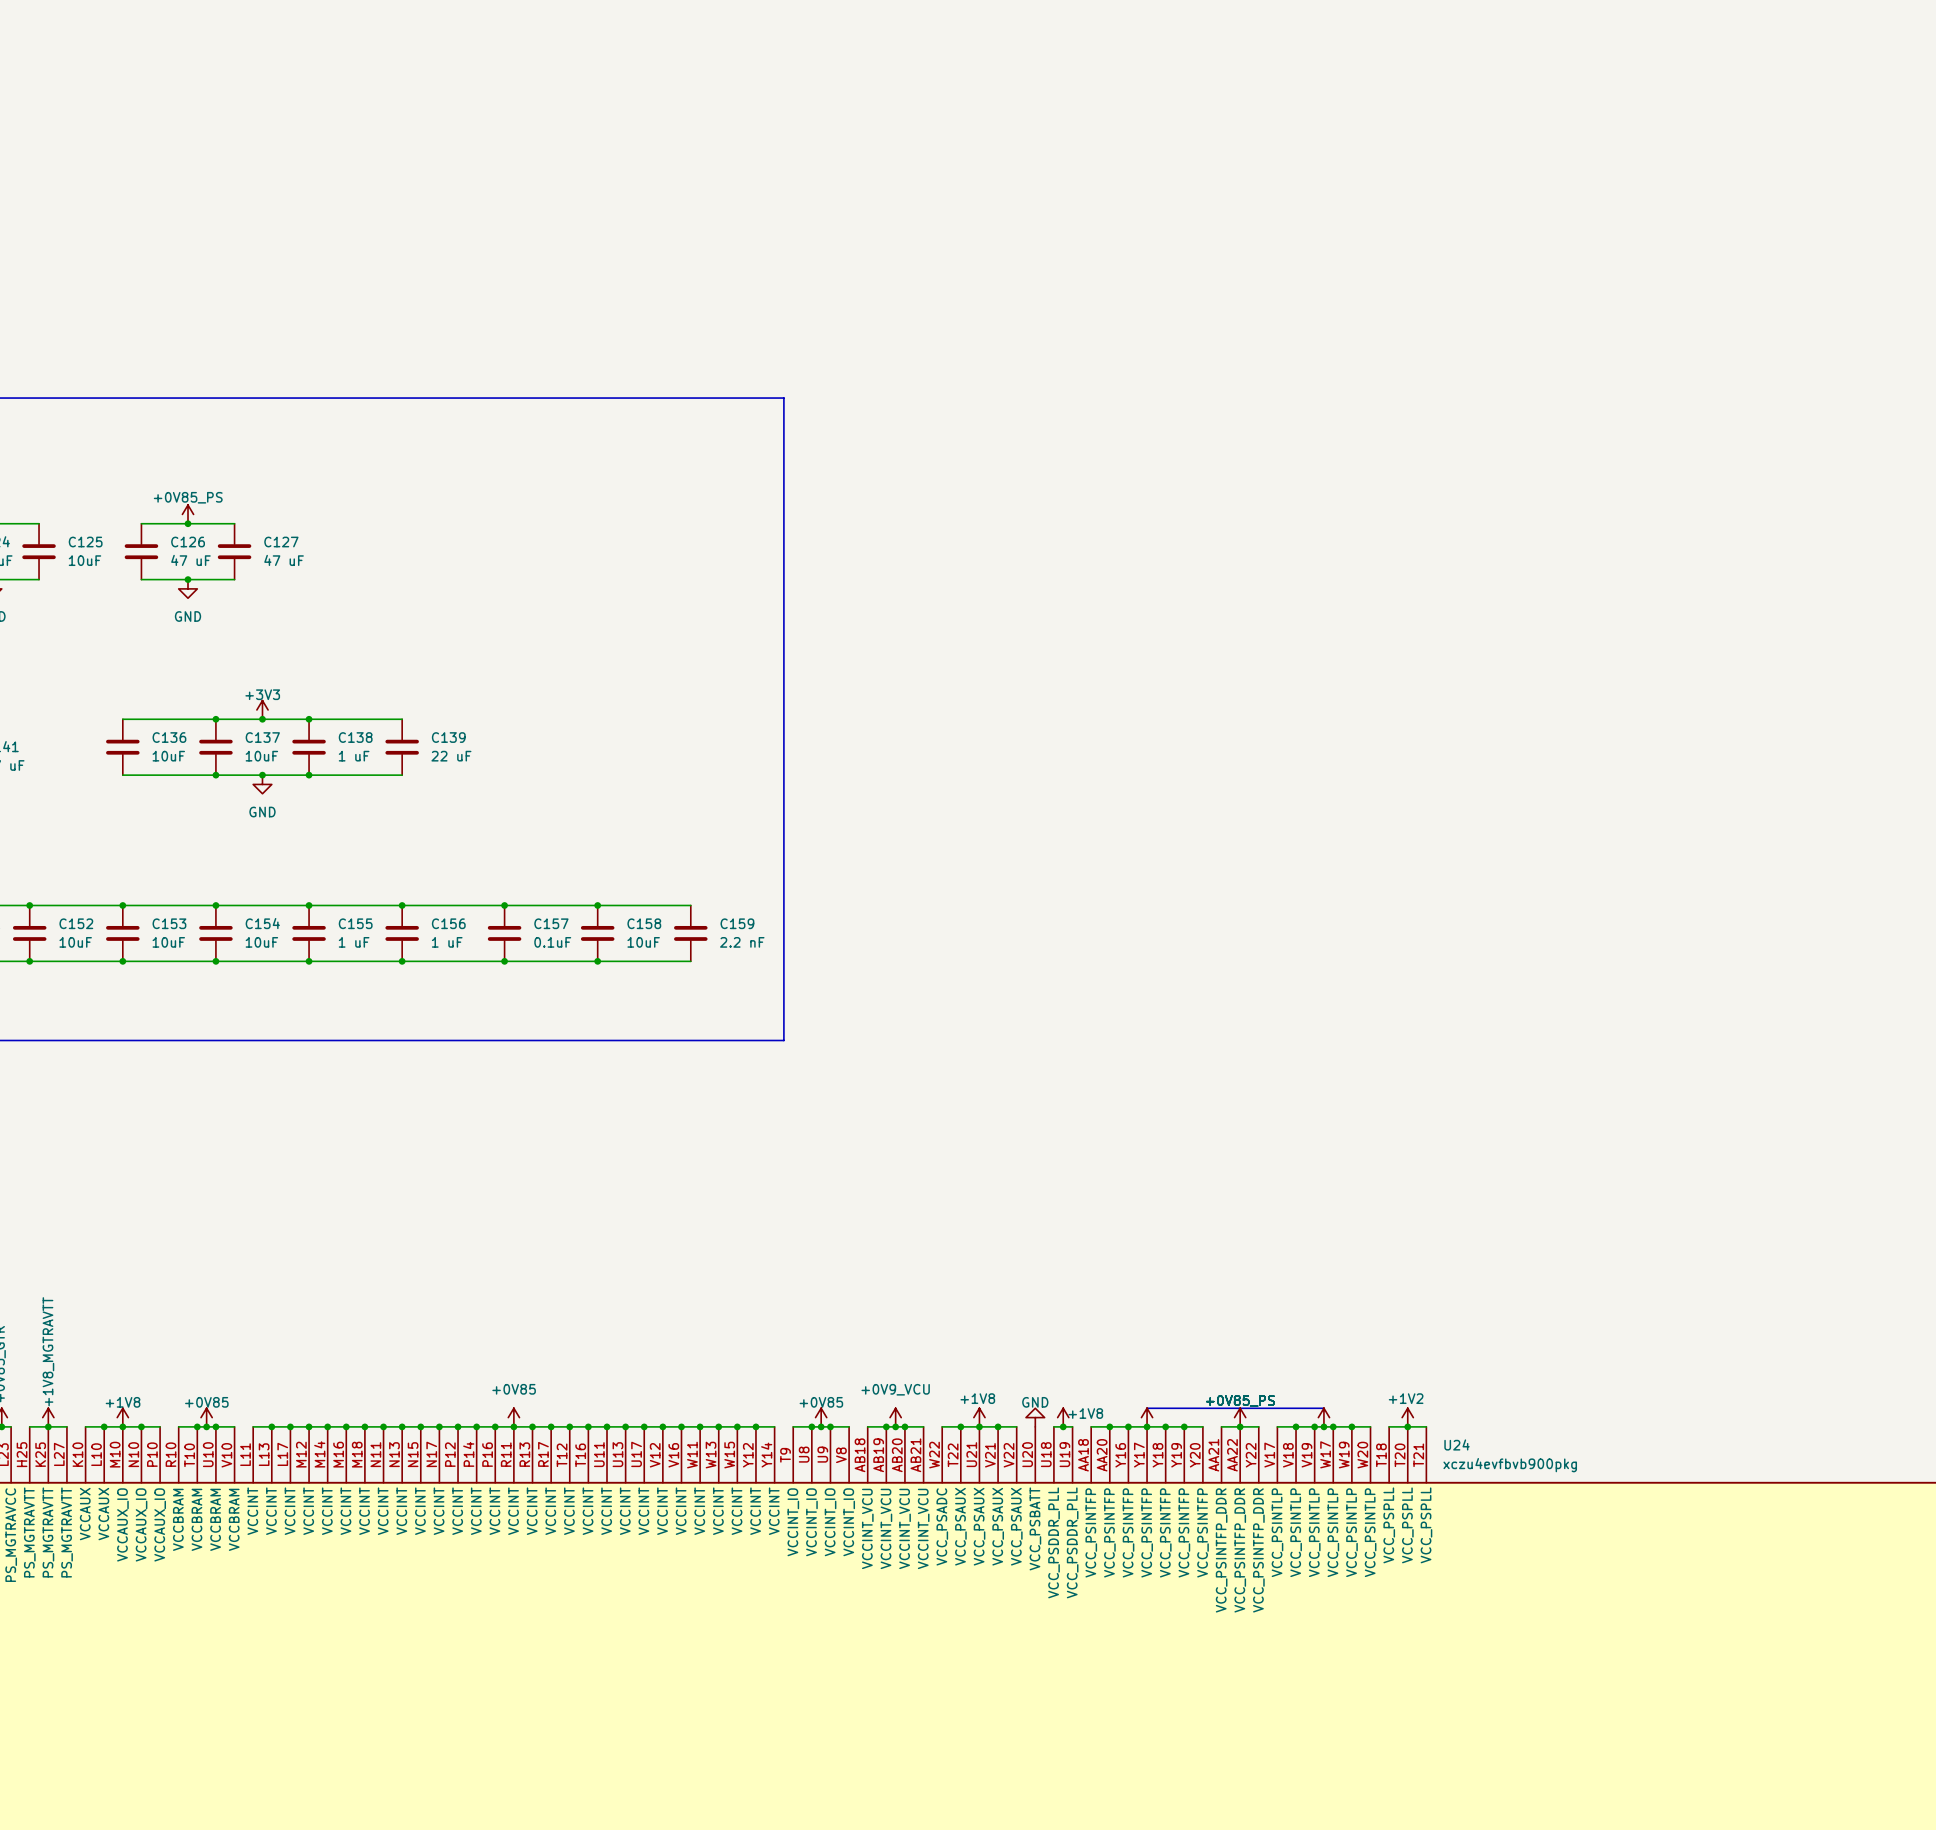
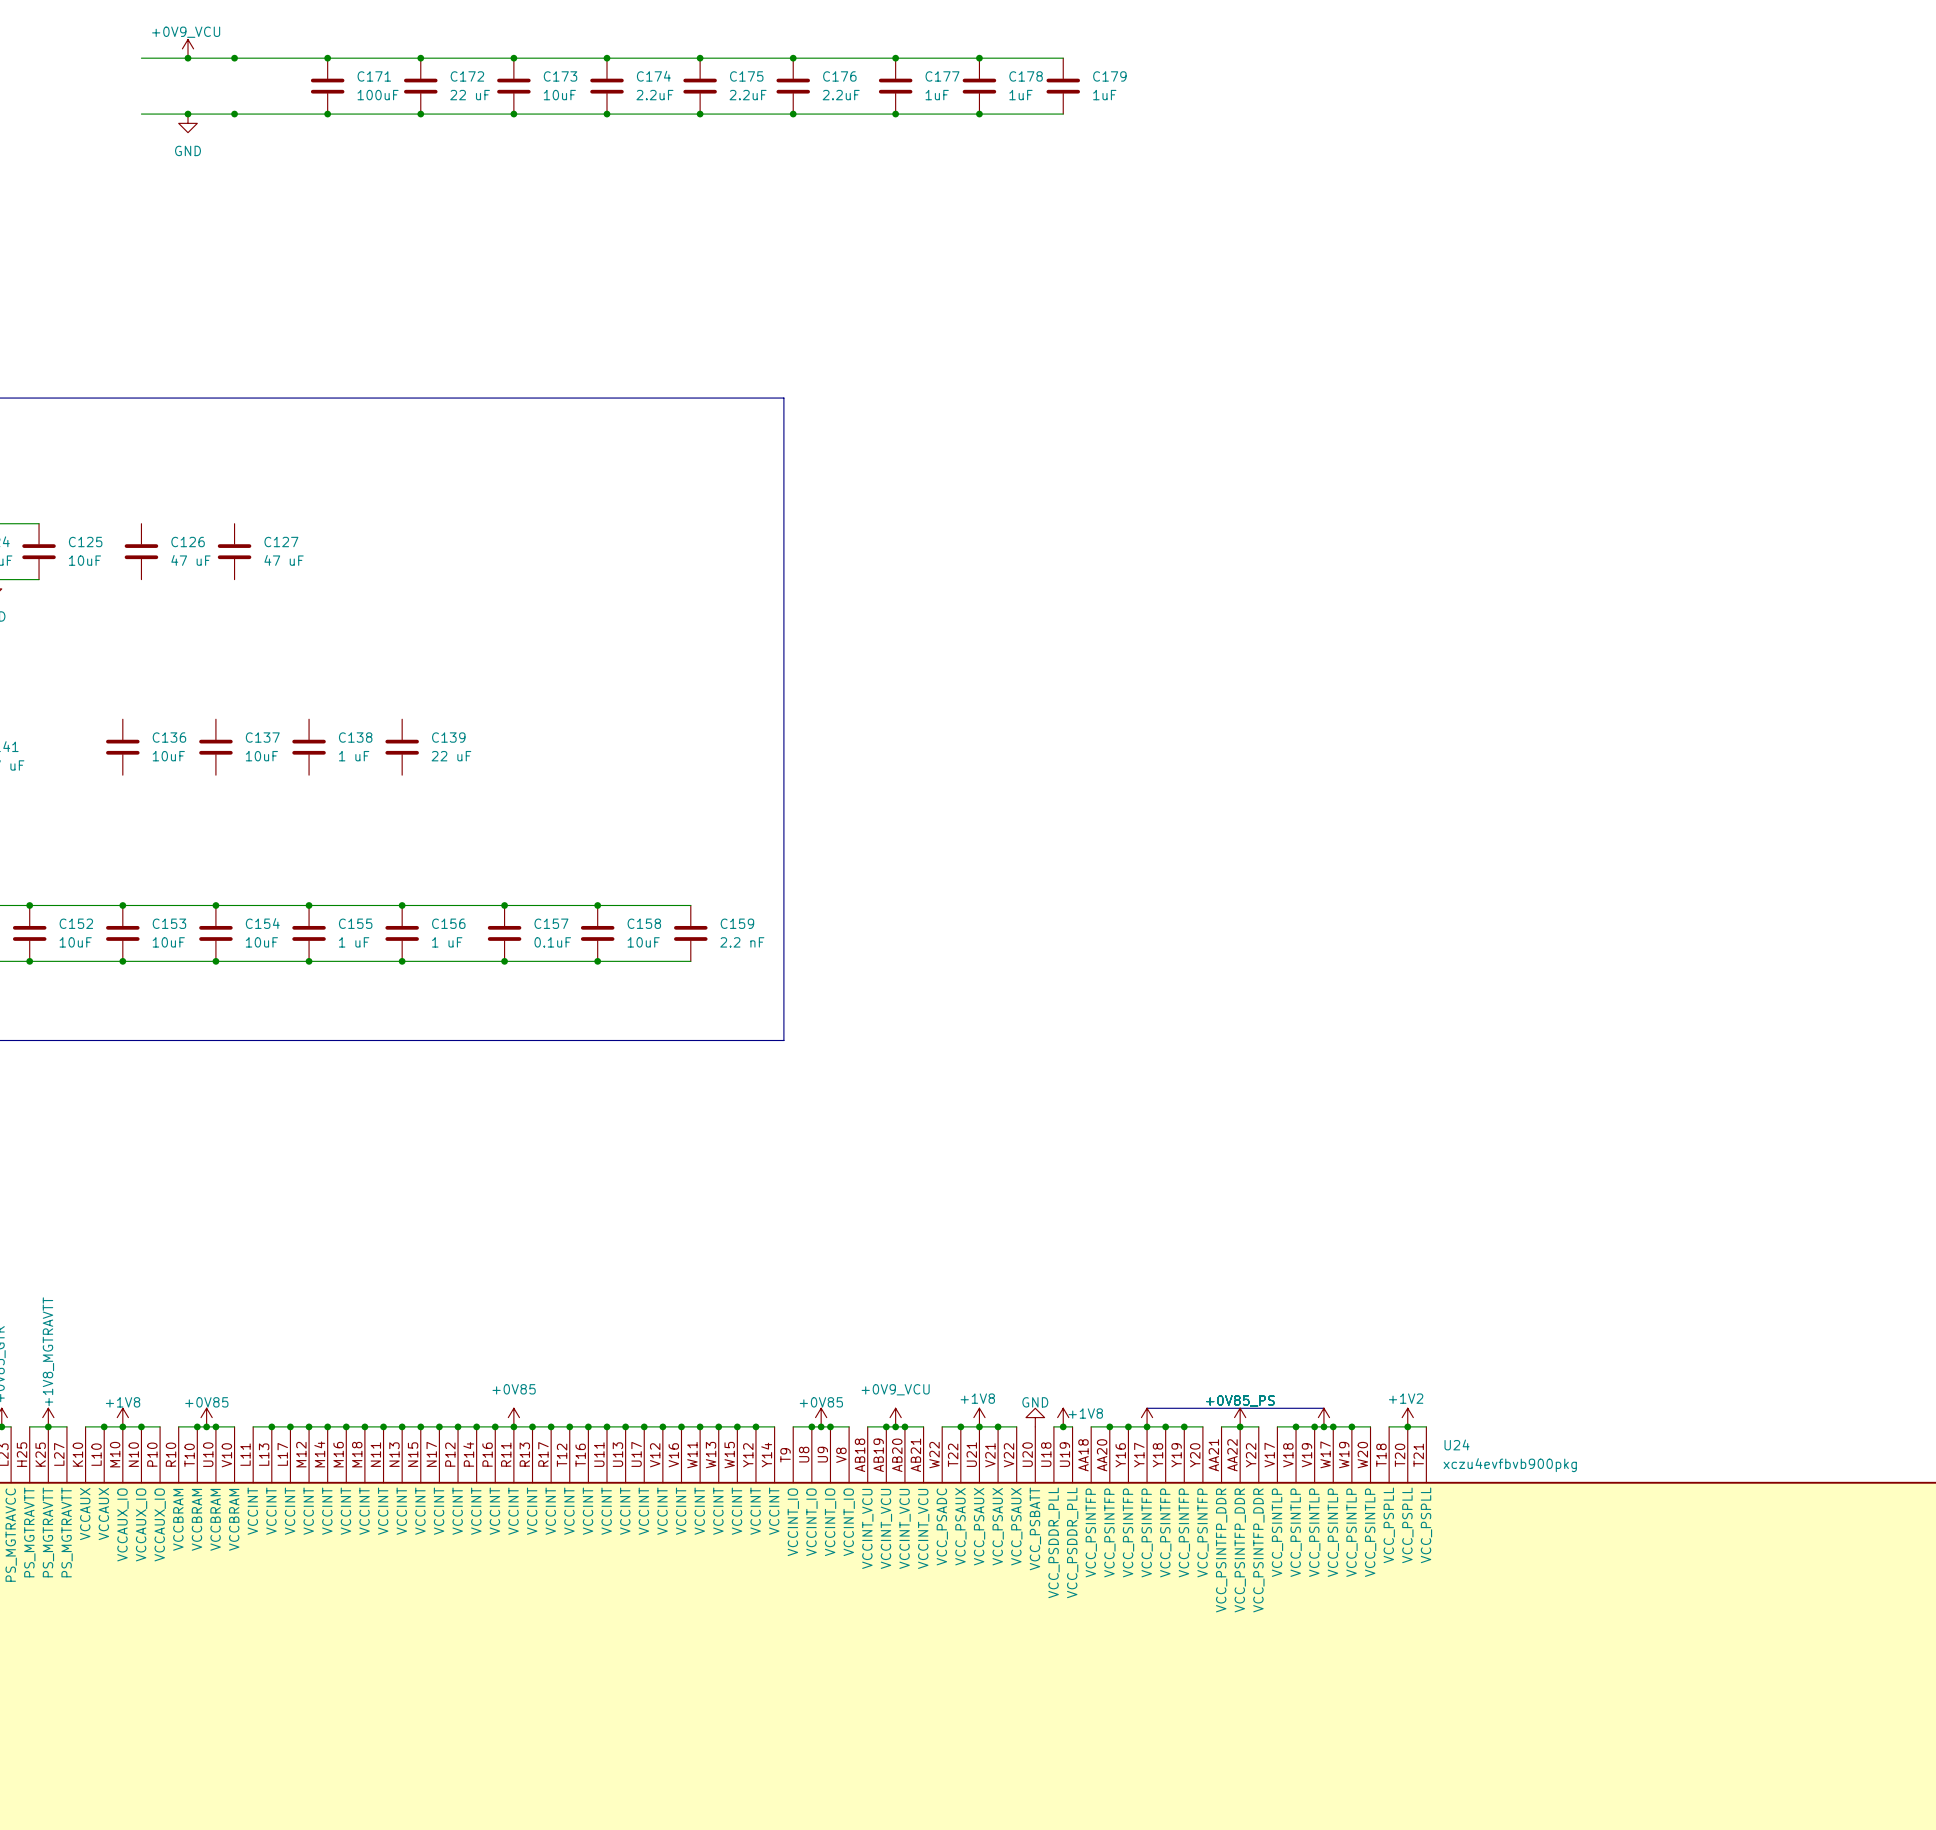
power symbol: none -> +0V9_VCU (188, 48)
wire: none -> (141, 58) (1063, 58)
junction: none -> (188, 58)
junction: none -> (234, 58)
junction: none -> (327, 58)
junction: none -> (420, 58)
junction: none -> (513, 58)
junction: none -> (607, 58)
junction: none -> (700, 58)
junction: none -> (793, 58)
junction: none -> (895, 58)
junction: none -> (979, 58)
C171: none -> 100uF (327, 86)
C172: none -> 22 uF (420, 86)
C173: none -> 10uF (513, 86)
C174: none -> 2.2uF (607, 86)
C175: none -> 2.2uF (700, 86)
C176: none -> 2.2uF (793, 86)
C177: none -> 1uF (895, 86)
C178: none -> 1uF (979, 86)
C179: none -> 1uF (1063, 86)
wire: none -> (141, 114) (1063, 114)
junction: none -> (188, 114)
junction: none -> (234, 114)
junction: none -> (327, 114)
junction: none -> (420, 114)
junction: none -> (513, 114)
junction: none -> (607, 114)
junction: none -> (700, 114)
junction: none -> (793, 114)
junction: none -> (895, 114)
junction: none -> (979, 114)
power symbol: none -> GND (188, 123)
power symbol: +0V85_PS (188, 514) -> none
wire: (141, 523) (234, 523) -> none
junction: (188, 523) -> none
wire: (141, 579) (234, 579) -> none
junction: (188, 579) -> none
power symbol: GND (188, 588) -> none
power symbol: +3V3 (262, 709) -> none
wire: (122, 719) (402, 719) -> none
junction: (215, 719) -> none
junction: (262, 719) -> none
junction: (309, 719) -> none
wire: (122, 775) (402, 775) -> none
junction: (215, 775) -> none
junction: (262, 775) -> none
junction: (309, 775) -> none
power symbol: GND (262, 784) -> none

